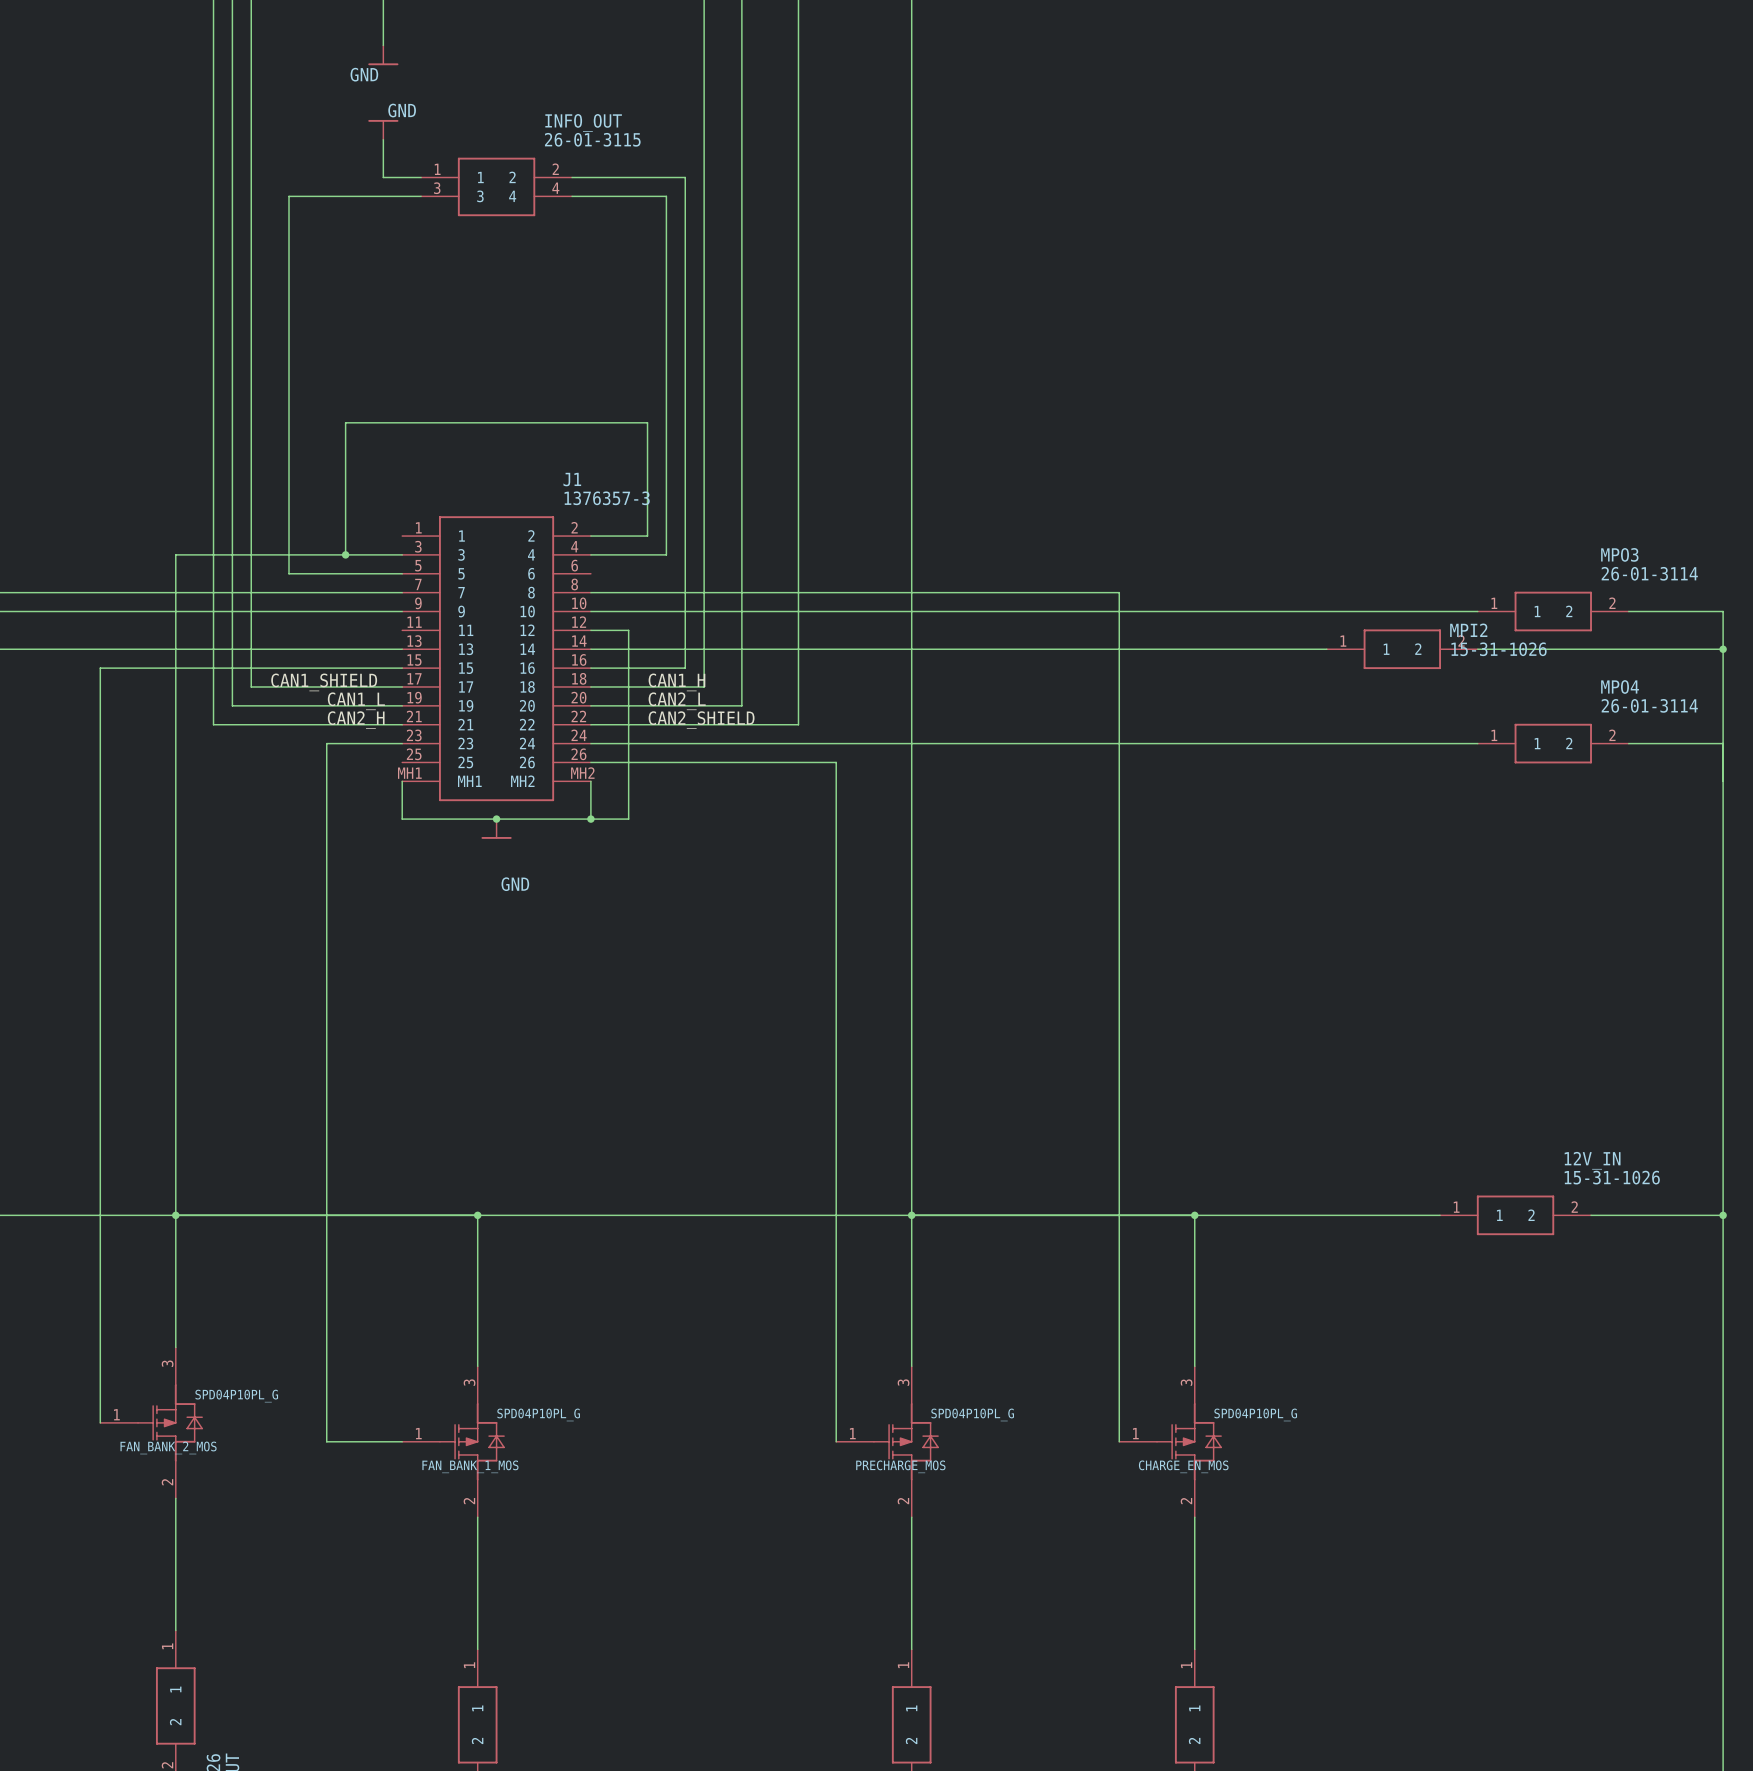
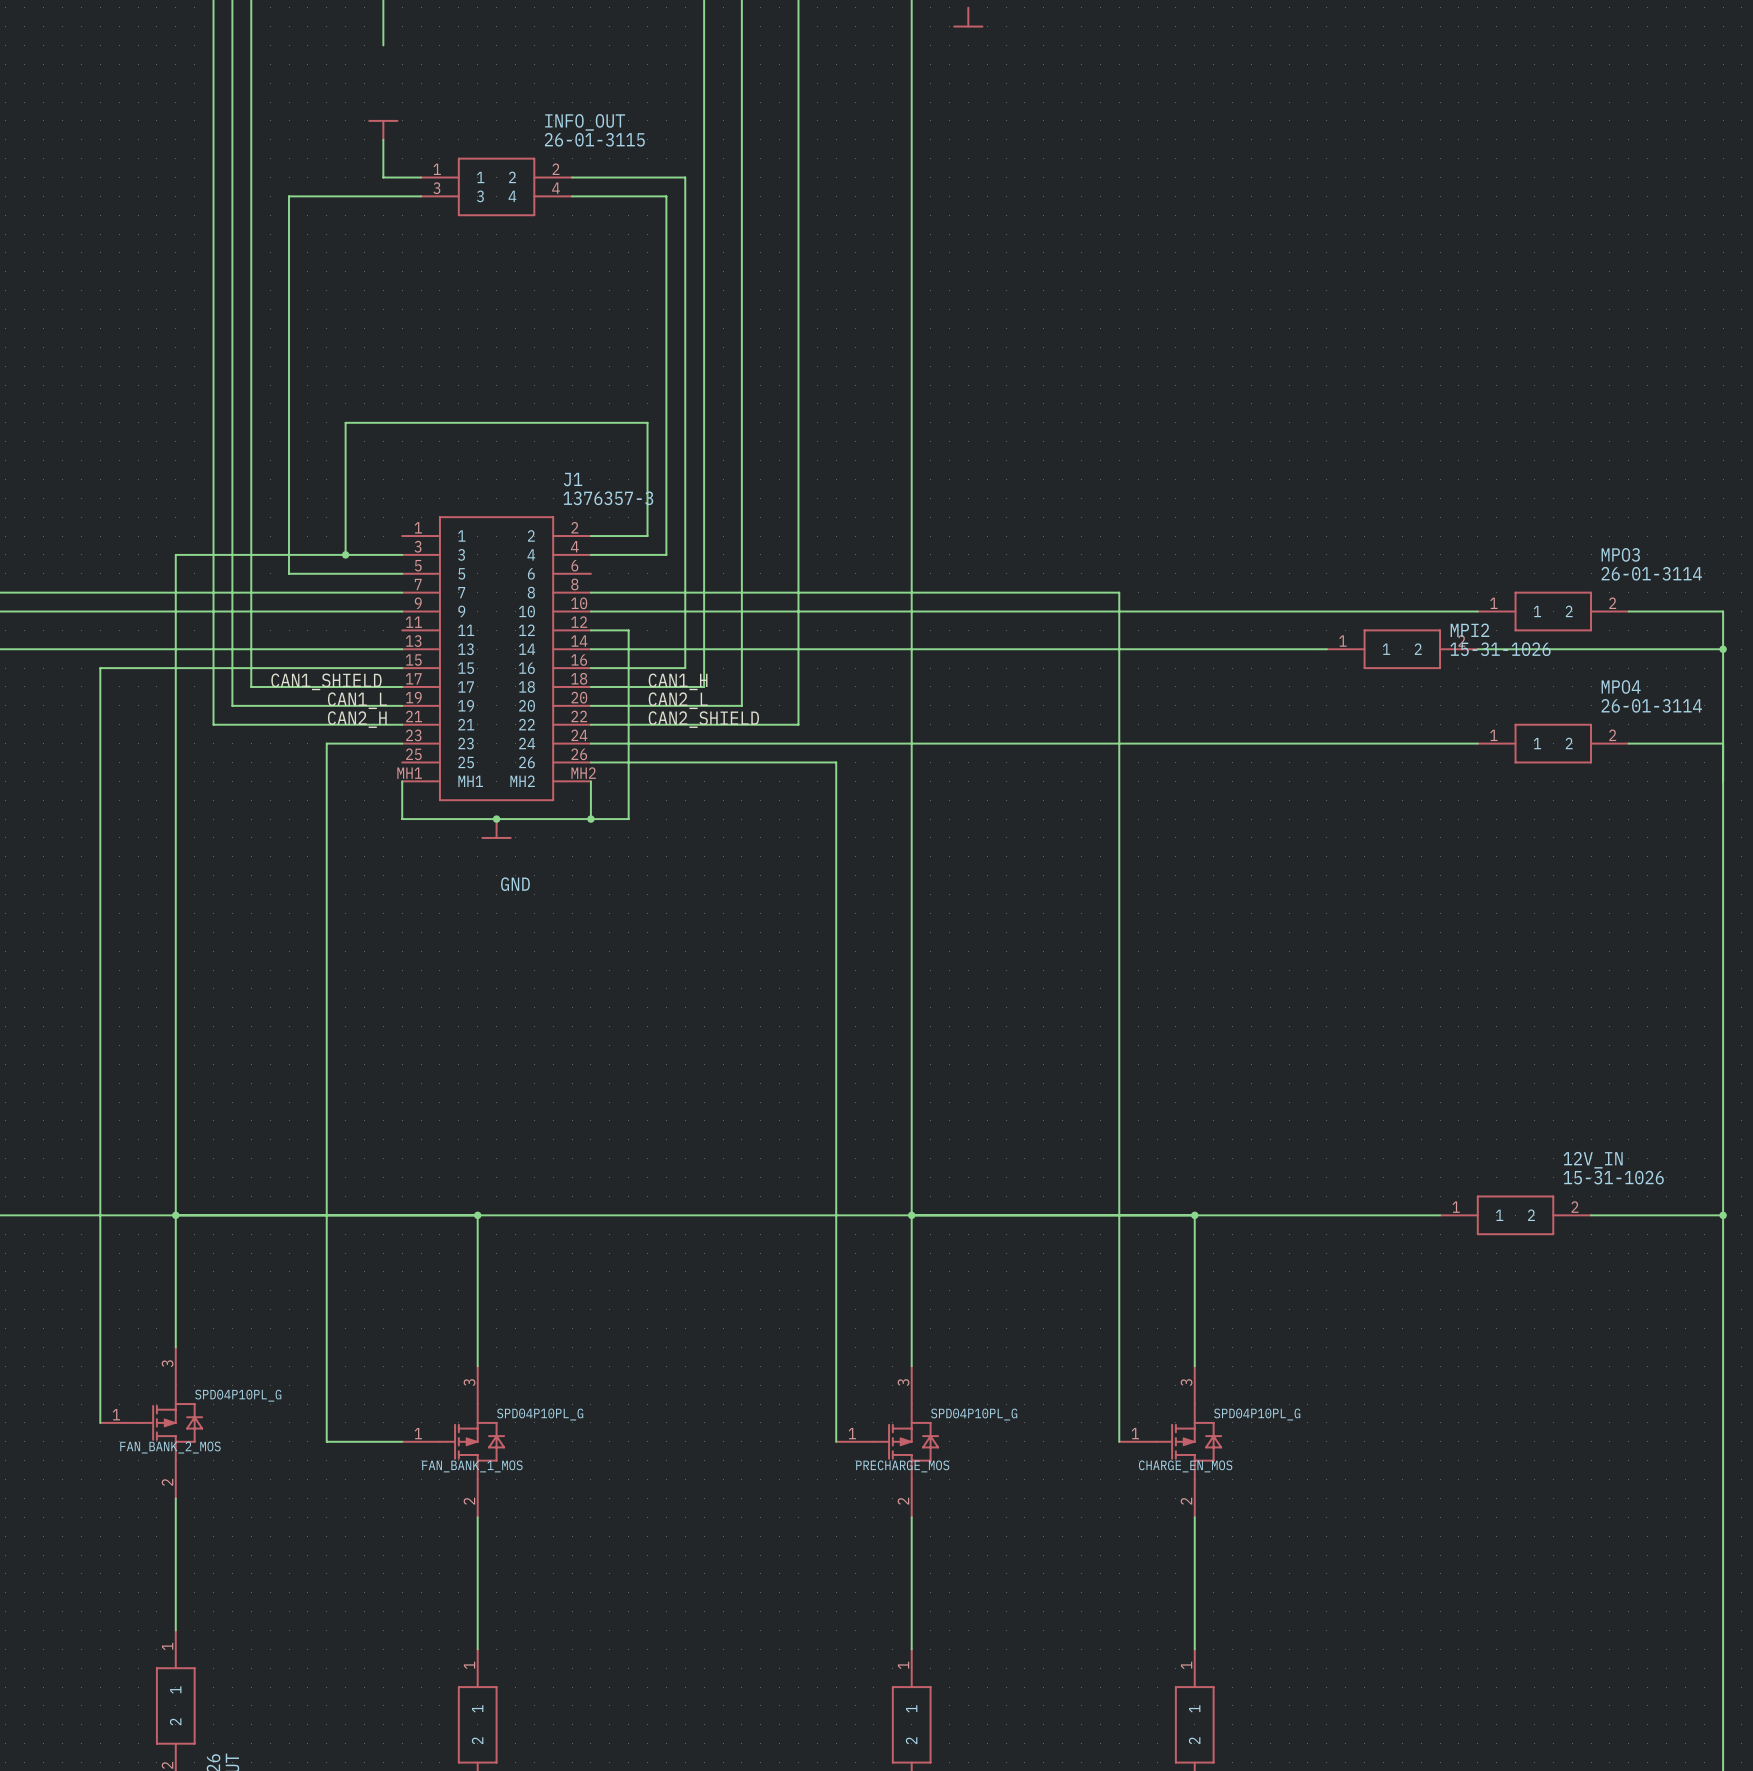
power symbol: none -> (968, 17)
power symbol: GND (383, 55) -> none
power symbol text: GND (364, 74) -> none

